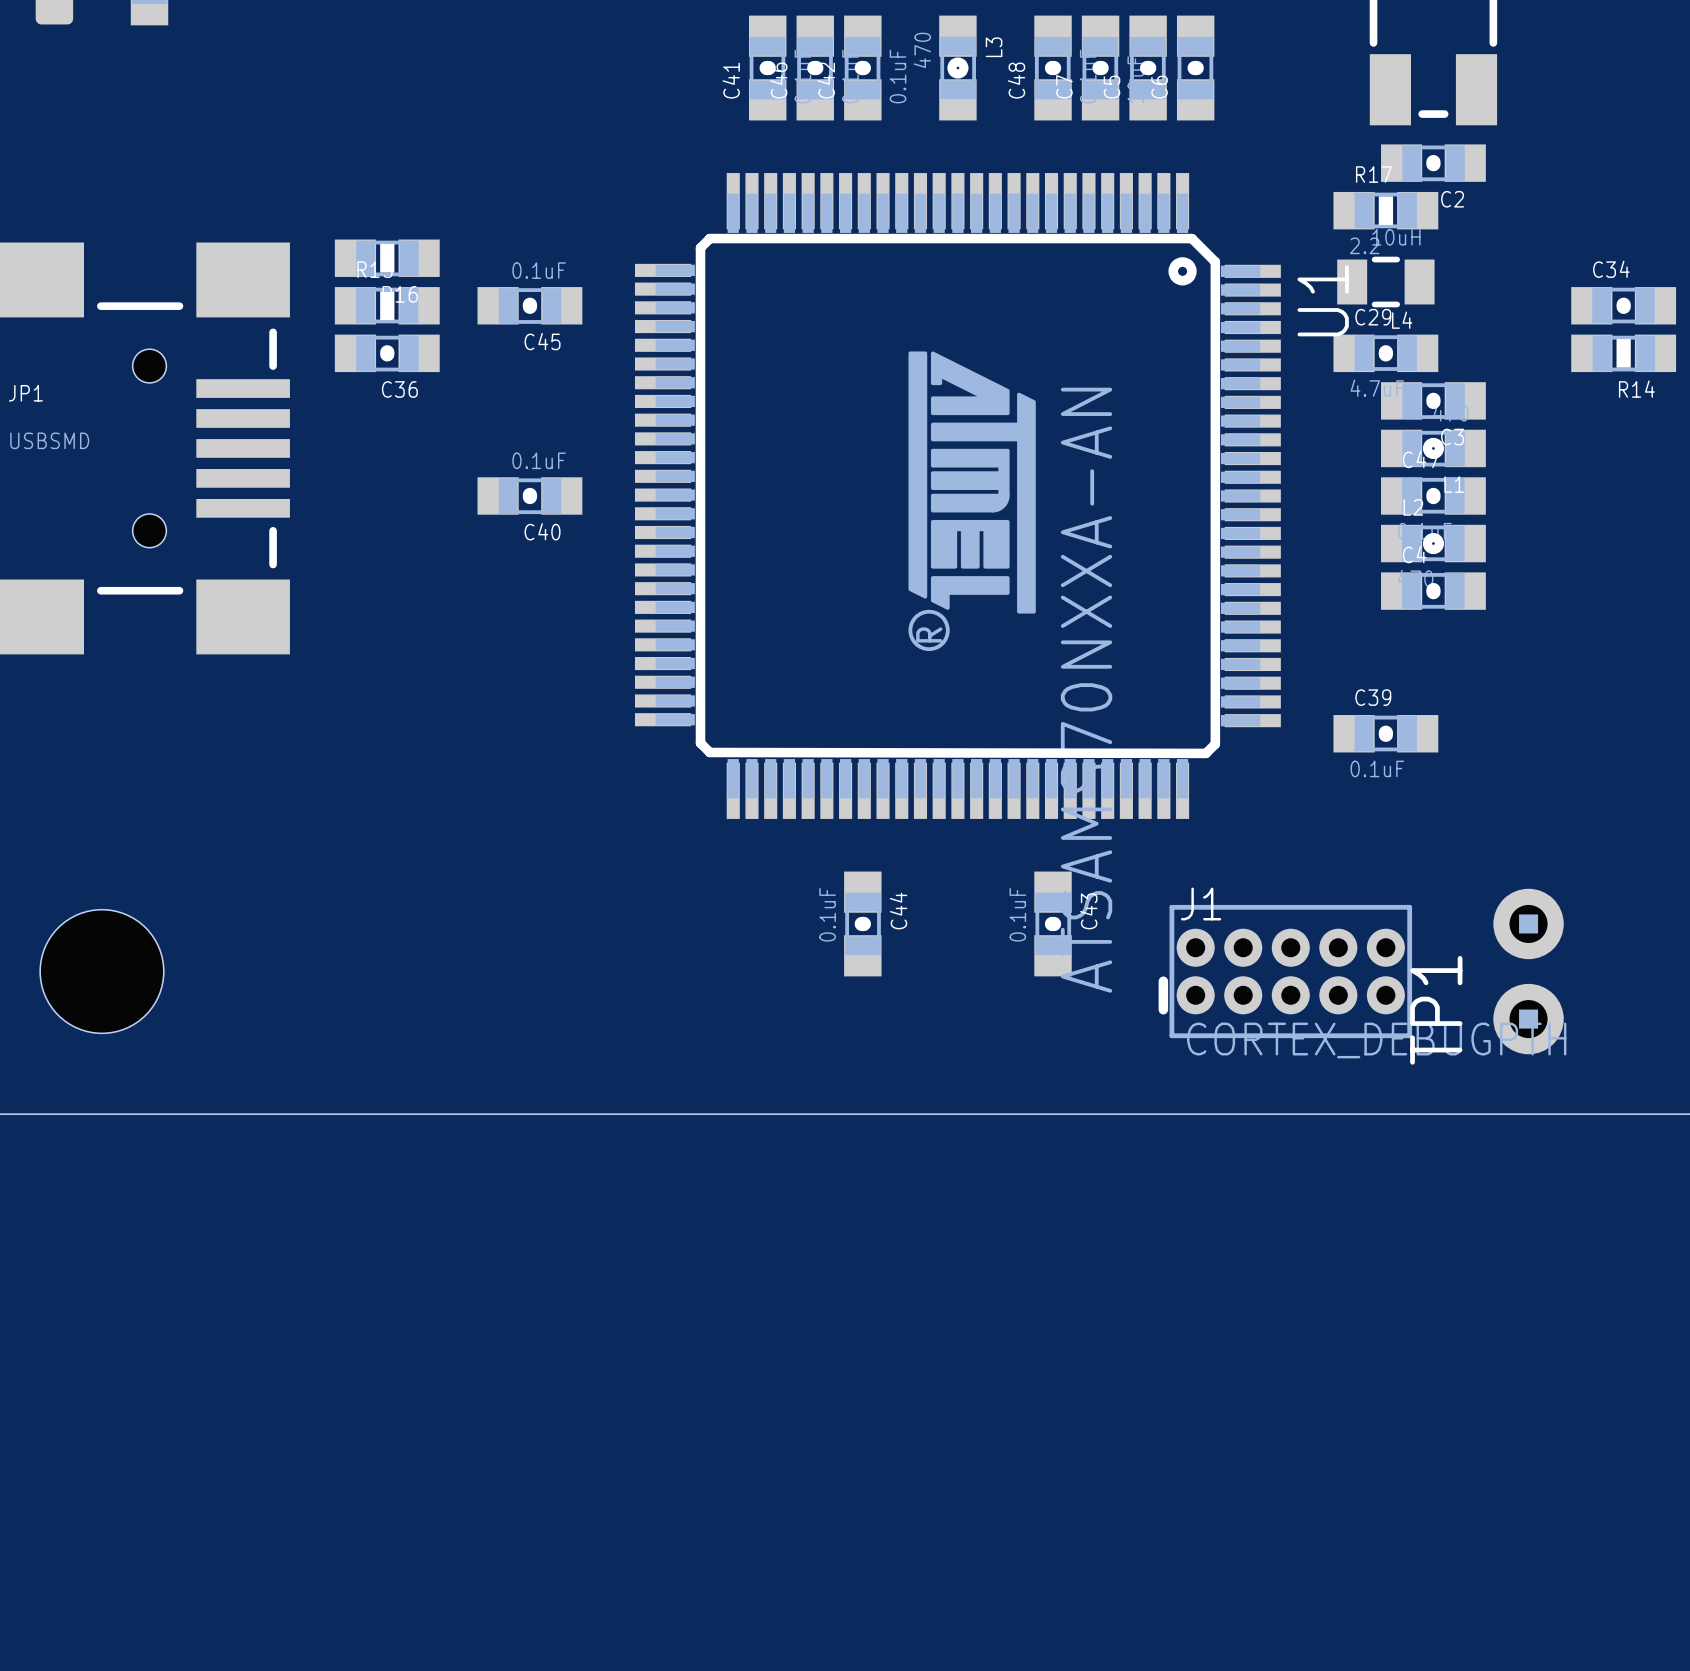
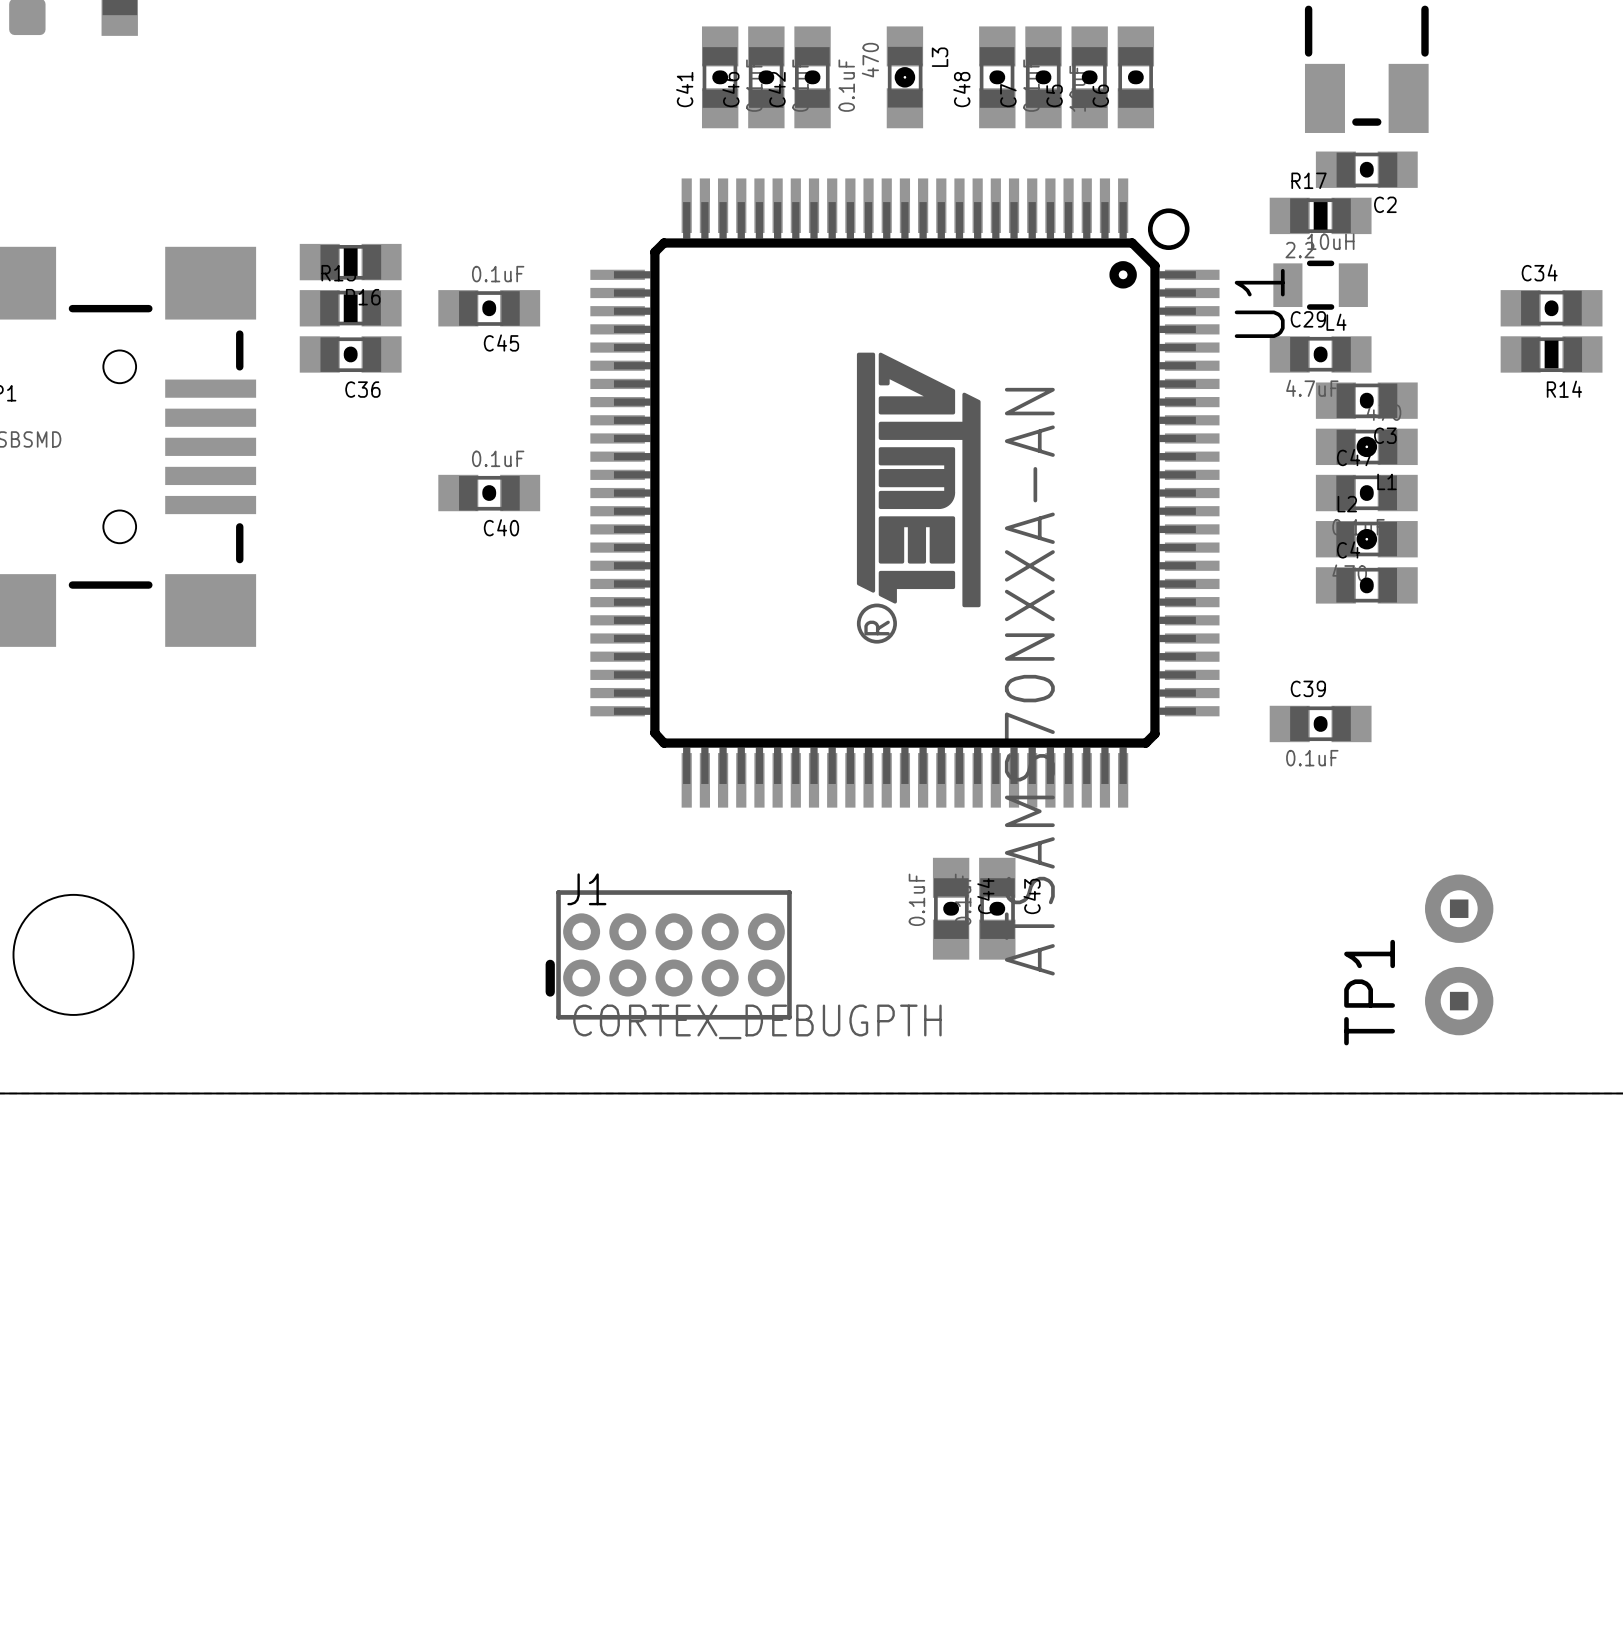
U1 footprint: [634, 173, 1281, 819] -> [590, 178, 1220, 808]
C44 position: (862, 923) -> (951, 908)
J1 position: (1285, 971) -> (668, 954)

